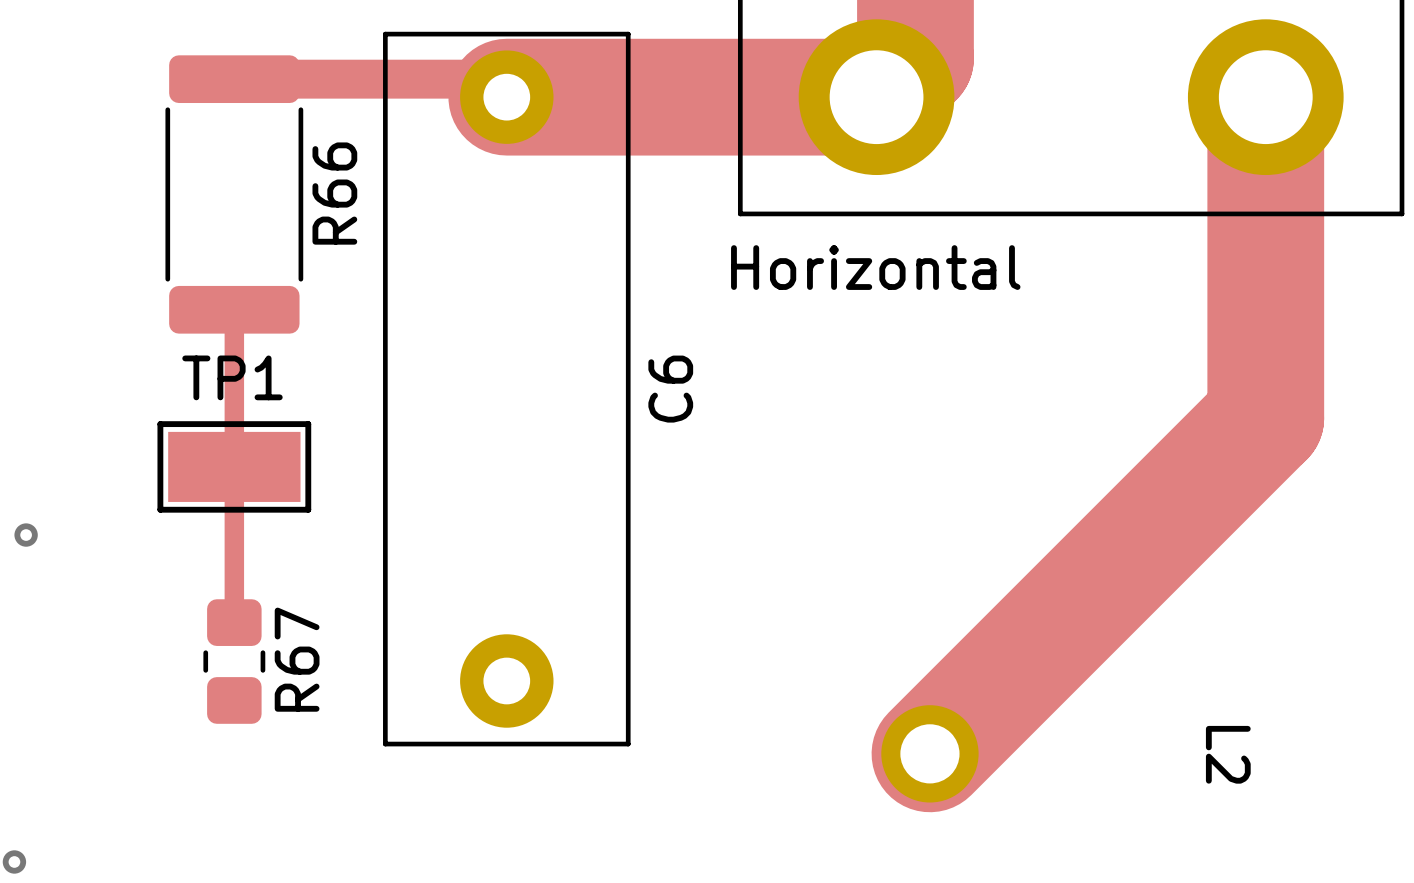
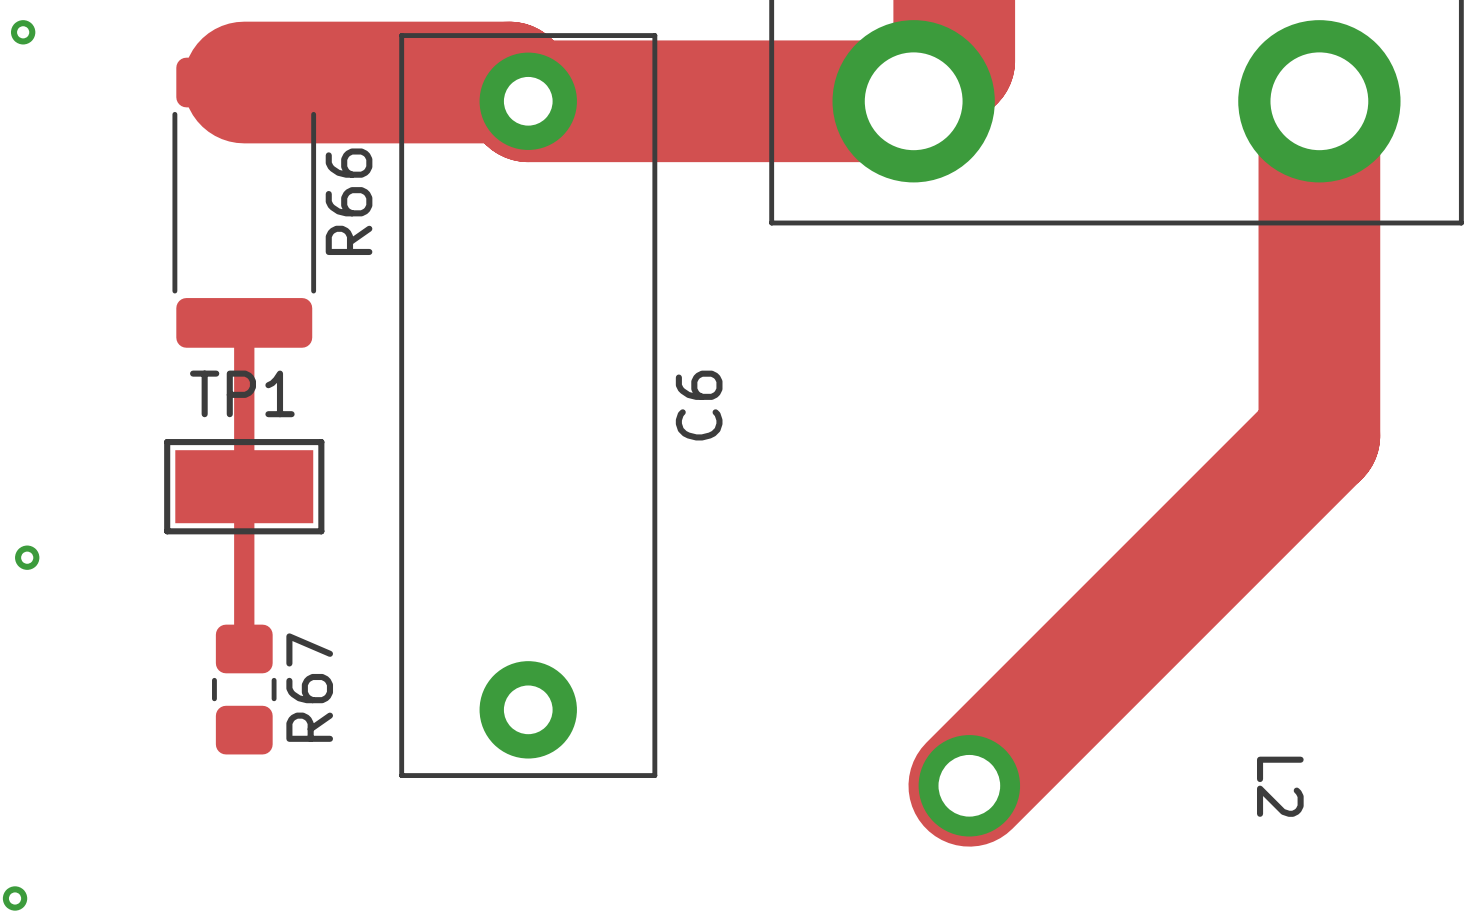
via: none -> (23, 32)
track width: thin (234, 79) (488, 79) (506, 97) -> thick (244, 82) (509, 82) (528, 101)
text: Horizontal (875, 267) -> none

